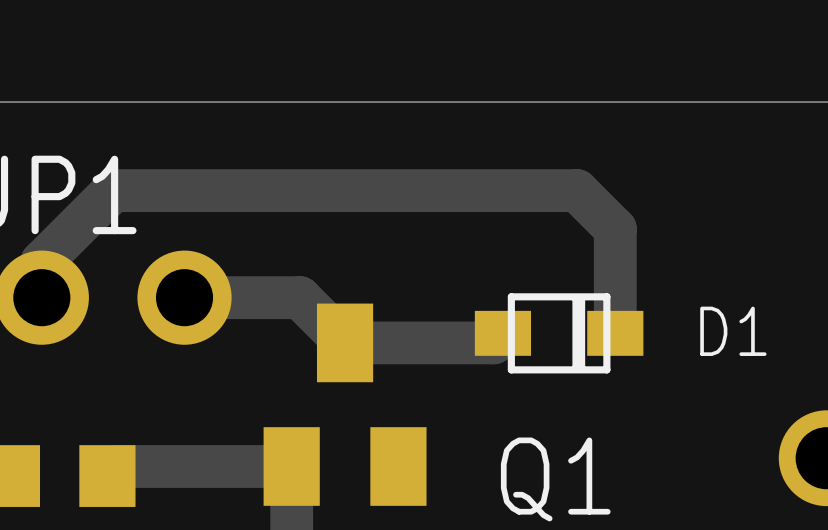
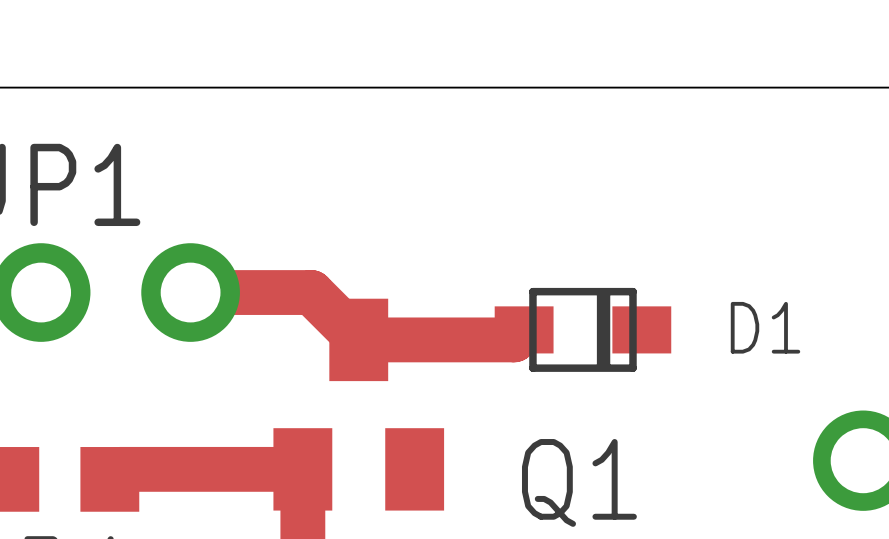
track: (41, 297) (41, 262) (113, 190) (576, 190) (615, 228) (615, 333) -> none

